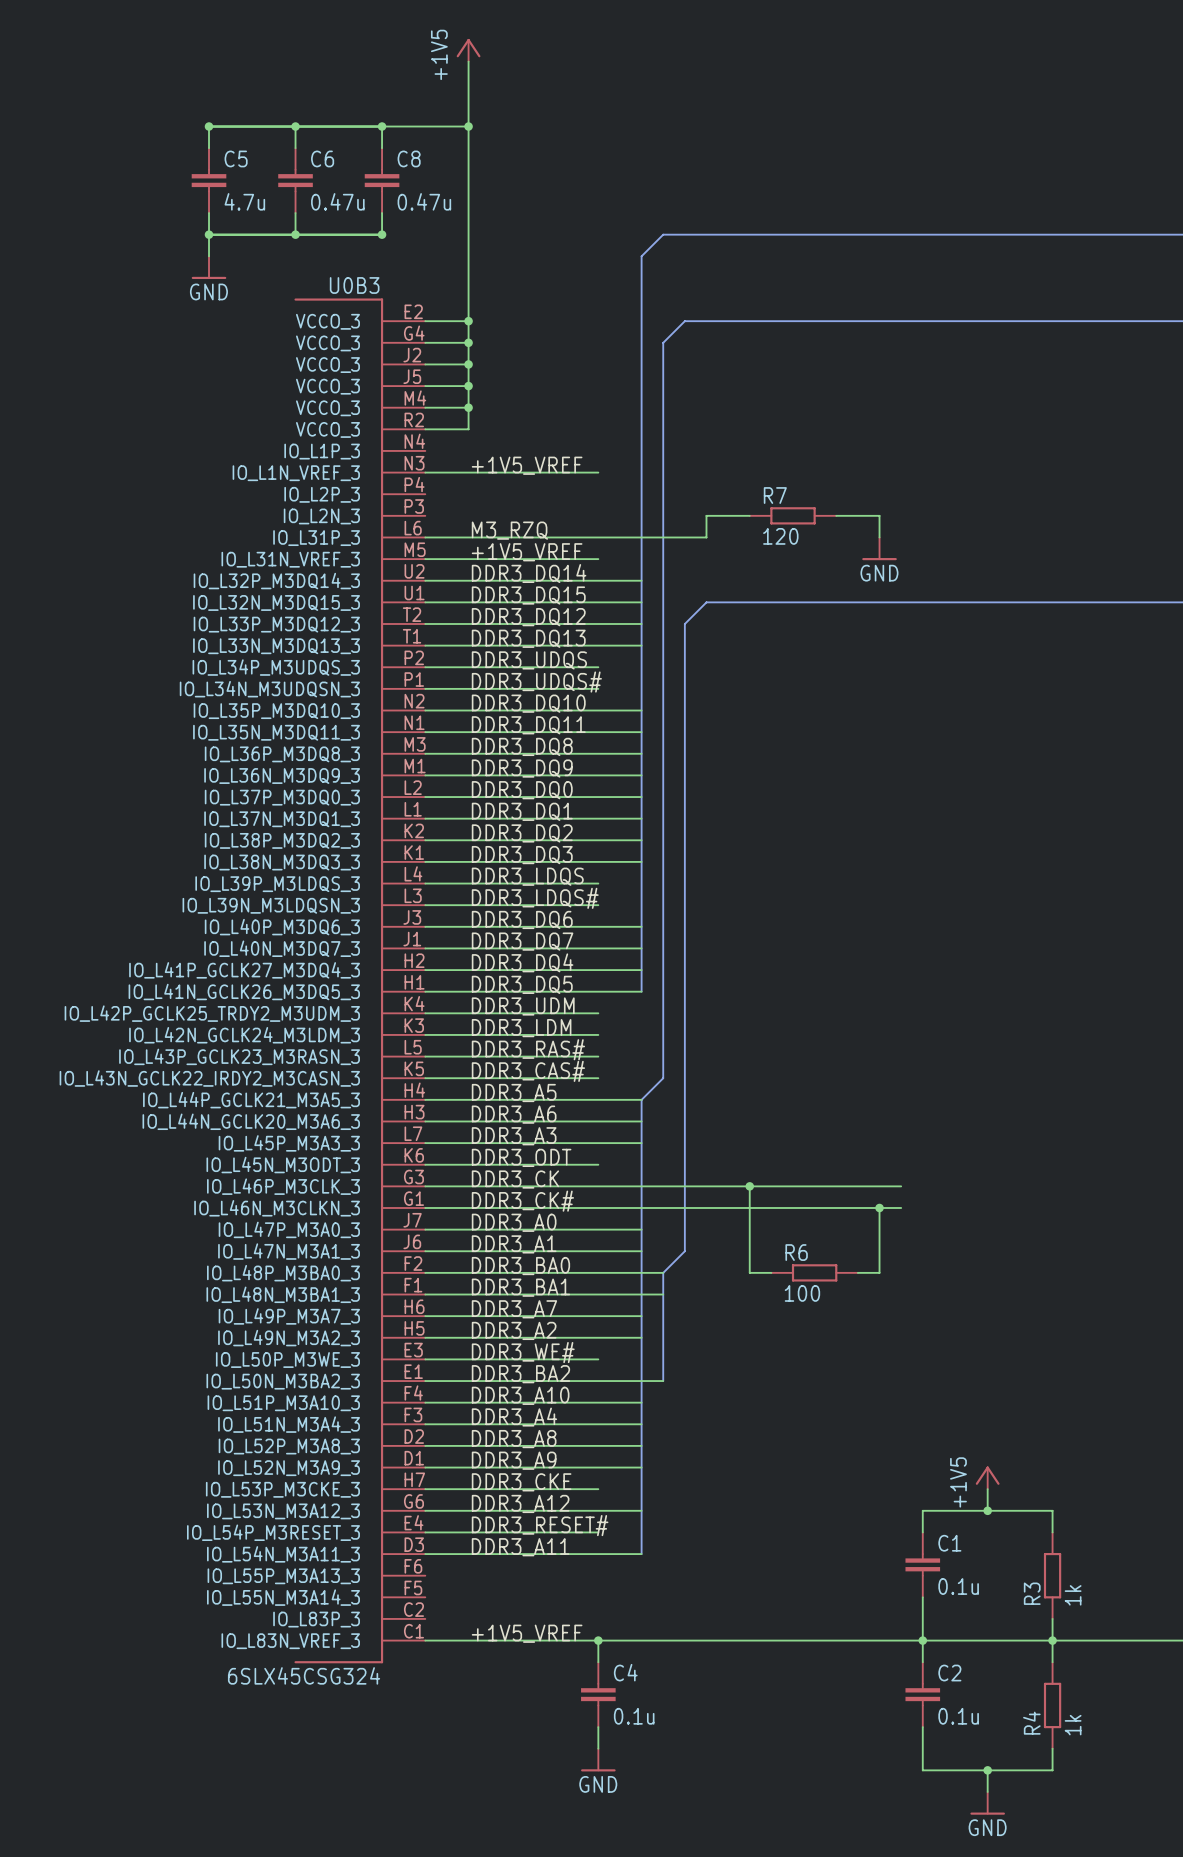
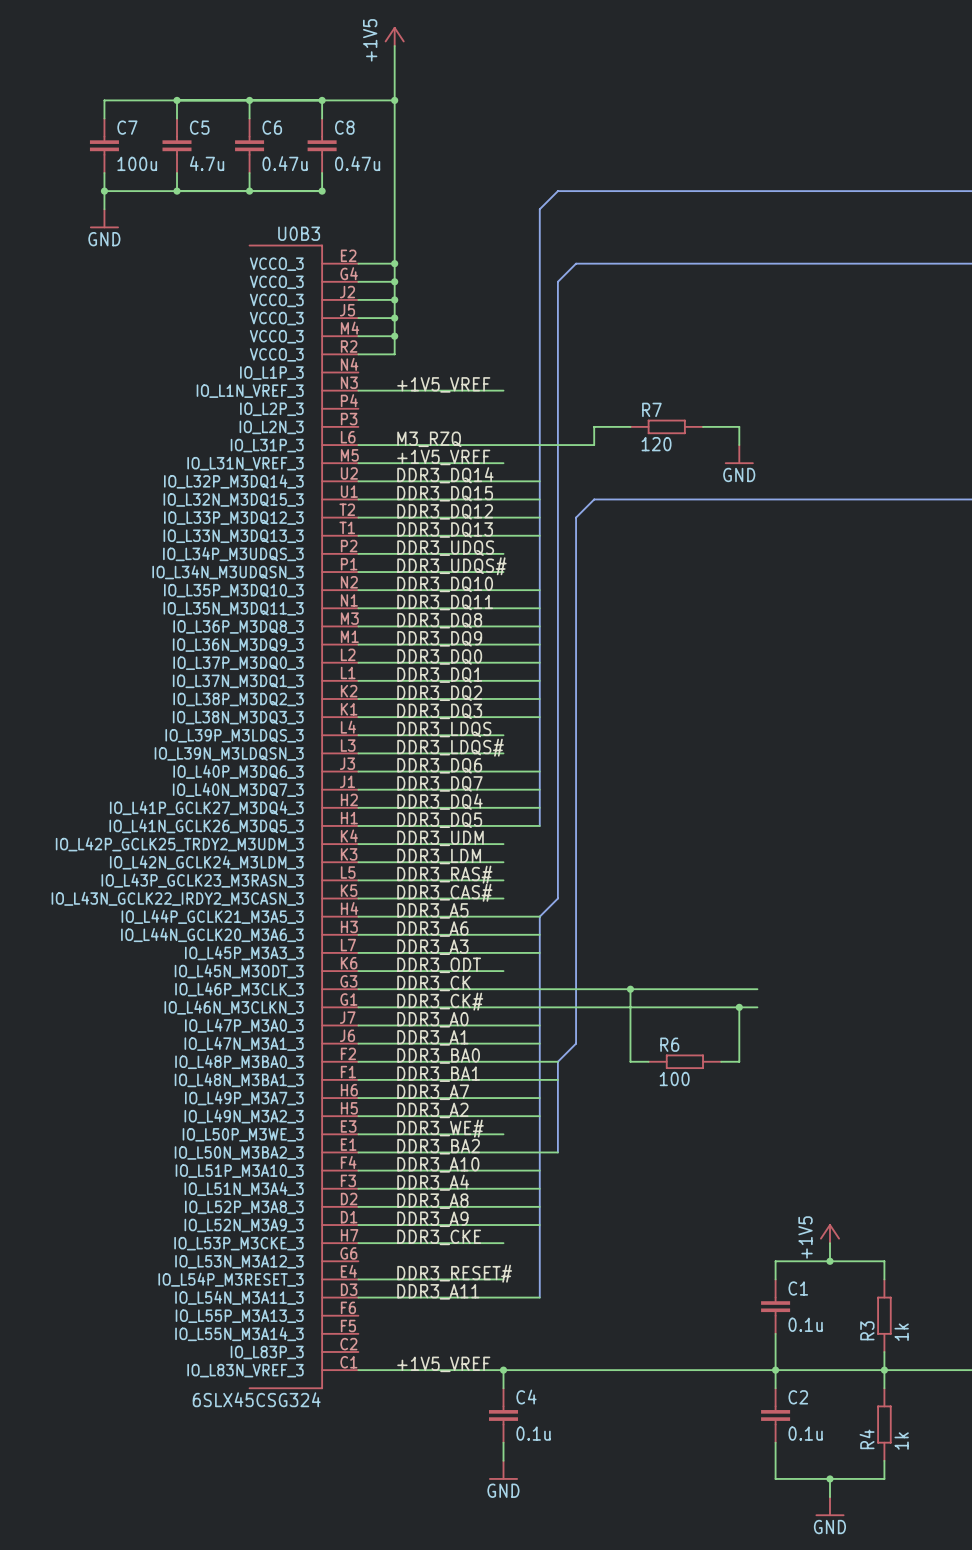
wire: none -> (177, 100) (104, 100) (104, 118)
C7: none -> 100u (104, 145)
wire: none -> (104, 172) (104, 209)
junction: none -> (104, 191)
wire: (209, 234) (209, 256) -> (177, 191) (104, 191)
power symbol position: GND (209, 267) -> GND (104, 218)
label: DDR3_A12 (520, 1503) -> none
wire: (425, 1510) (641, 1510) -> none

